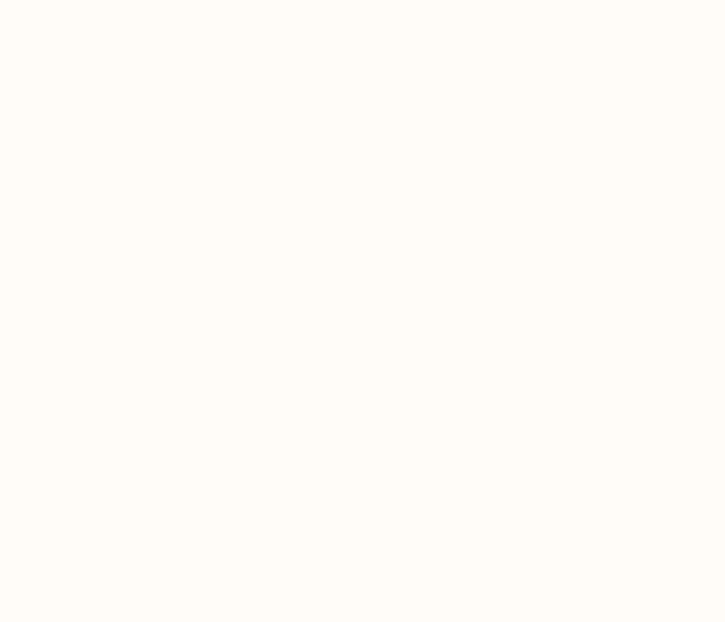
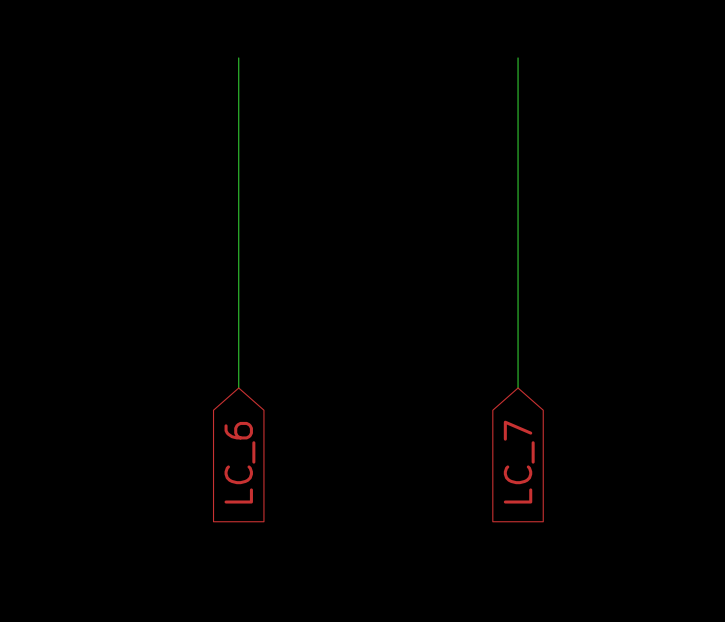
wire: none -> (238, 57) (238, 388)
wire: none -> (518, 57) (518, 388)
global label: none -> LC_6 (239, 462)
global label: none -> LC_7 (519, 462)

